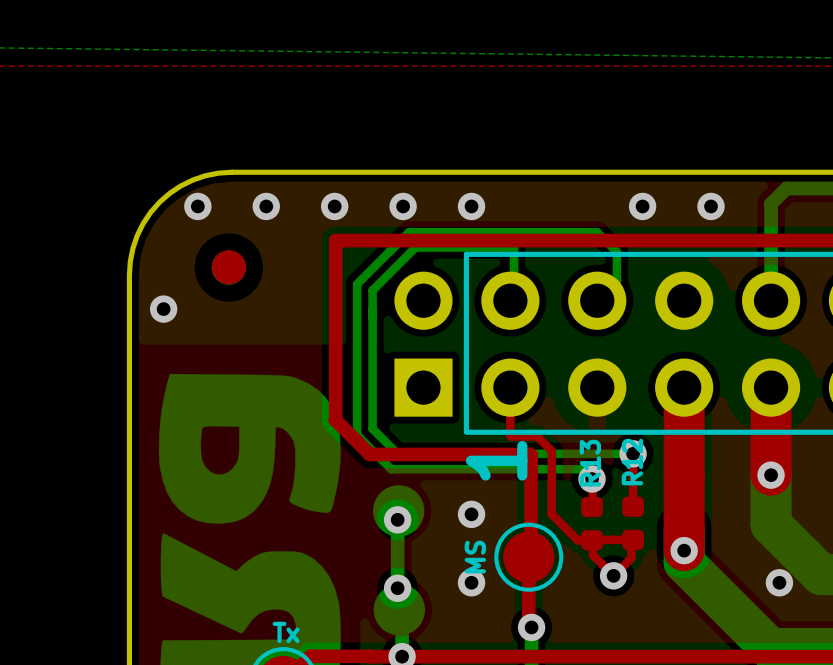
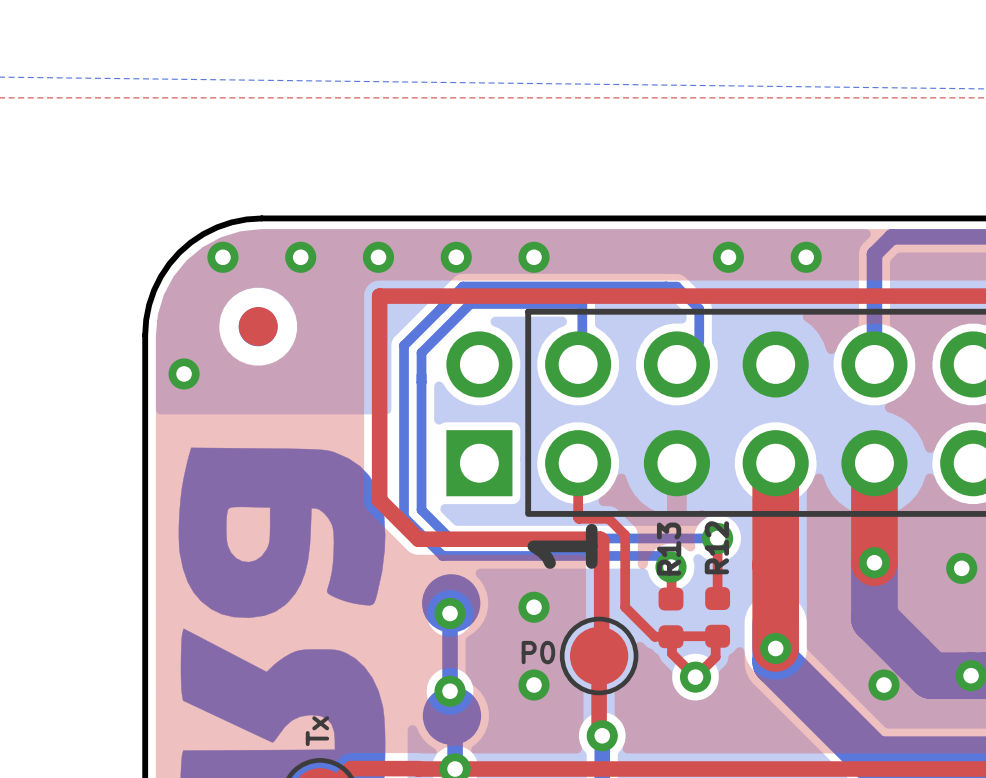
part value: MS (475, 557) -> P0 (538, 652)
part value rotation: 0° (286, 632) -> 90° counterclockwise (317, 731)

